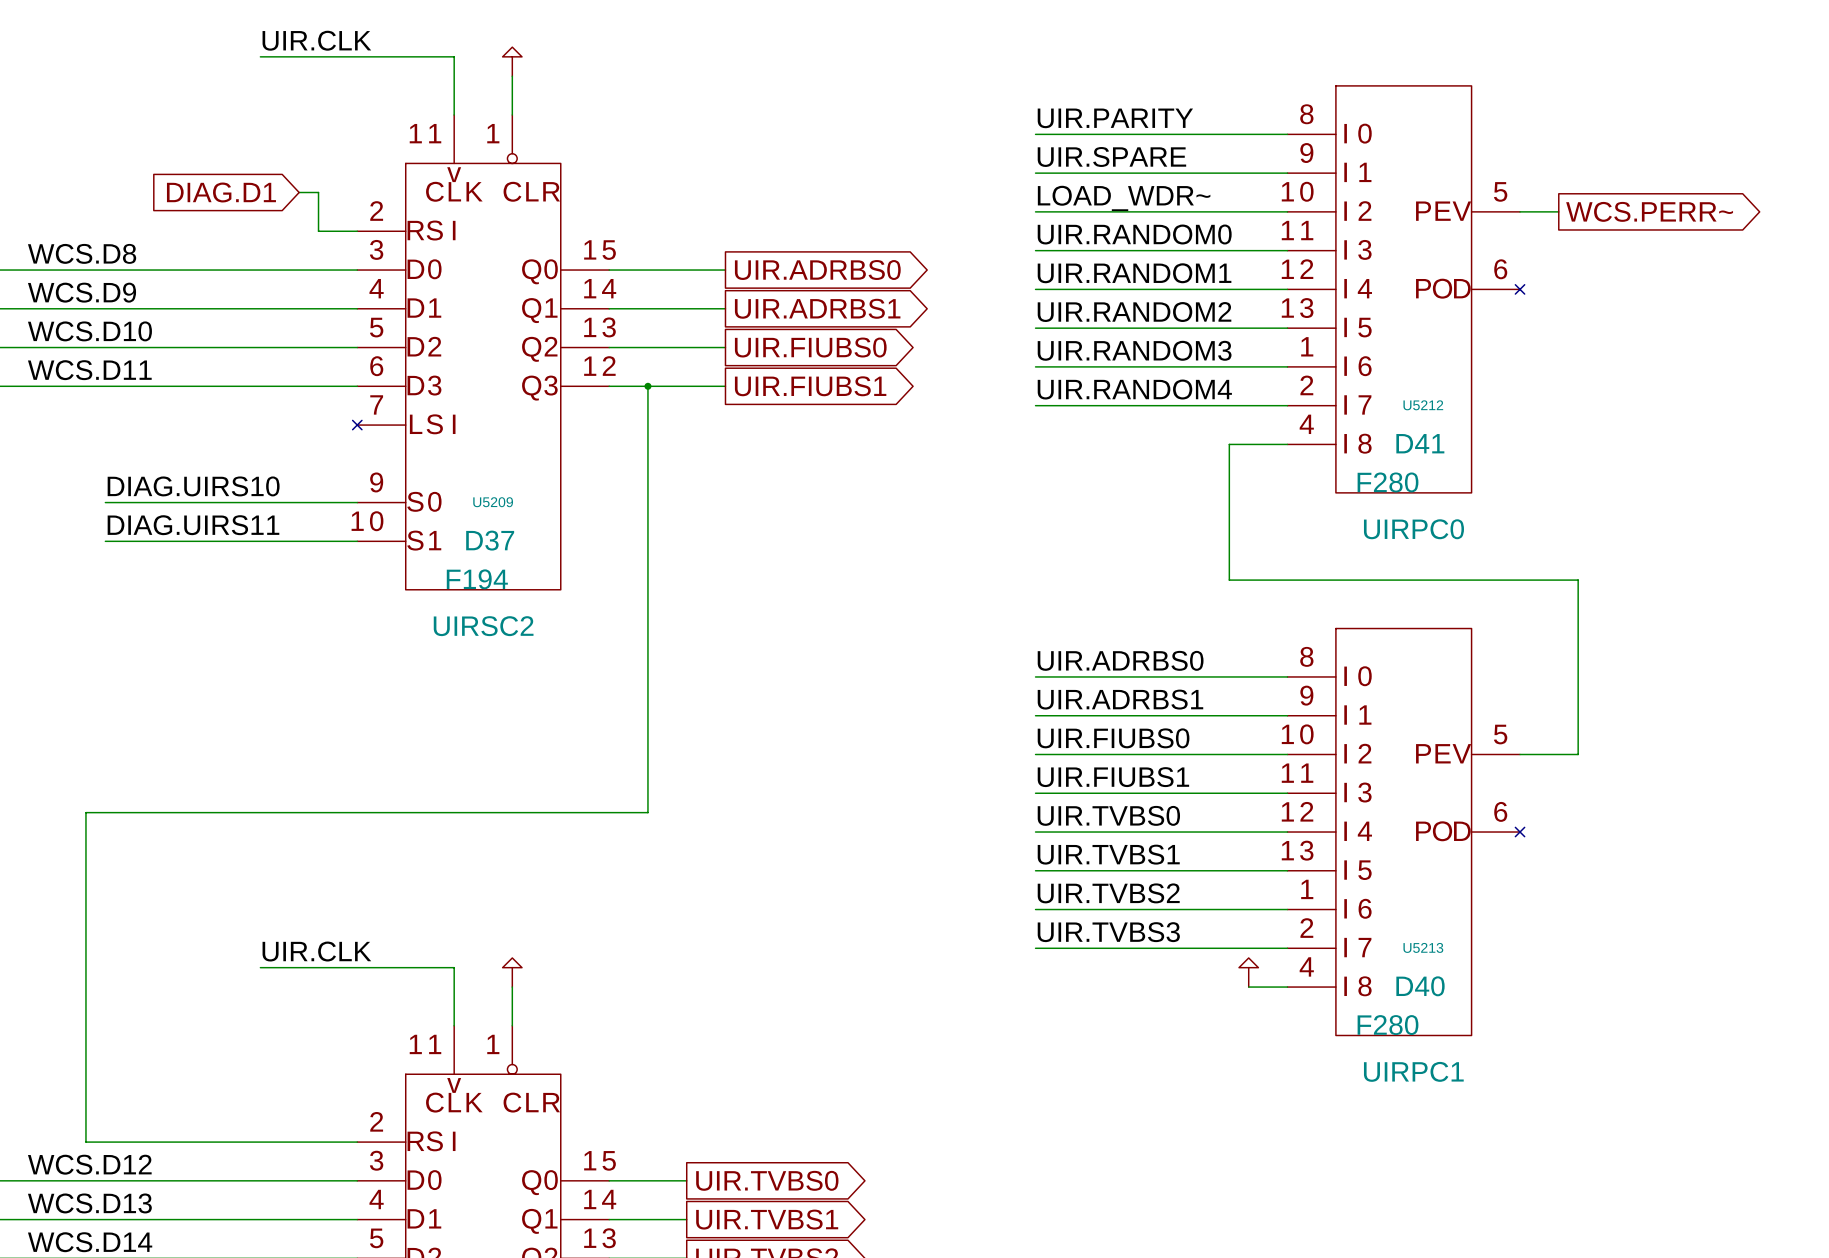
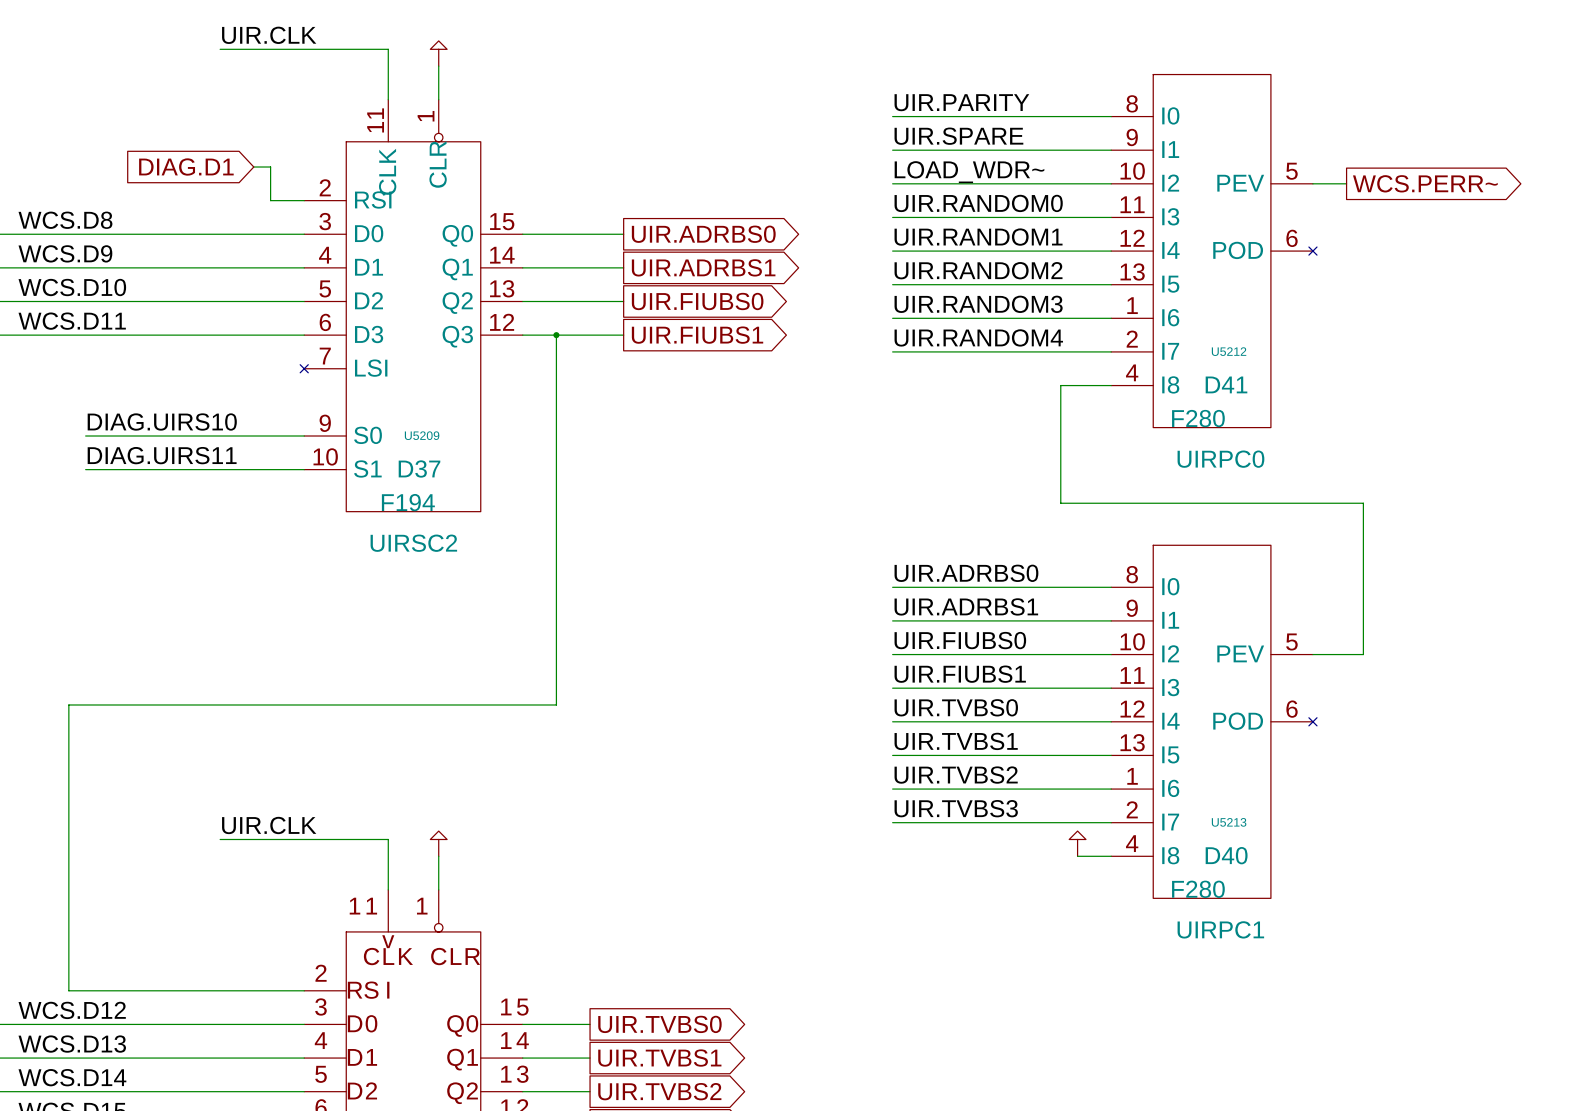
U5212 symbol: [1287, 85, 1521, 493] -> [1111, 74, 1313, 428]
U5209 symbol: [357, 114, 610, 590] -> [304, 99, 523, 512]
U5213 symbol: [1287, 628, 1521, 1036] -> [1111, 545, 1313, 899]

